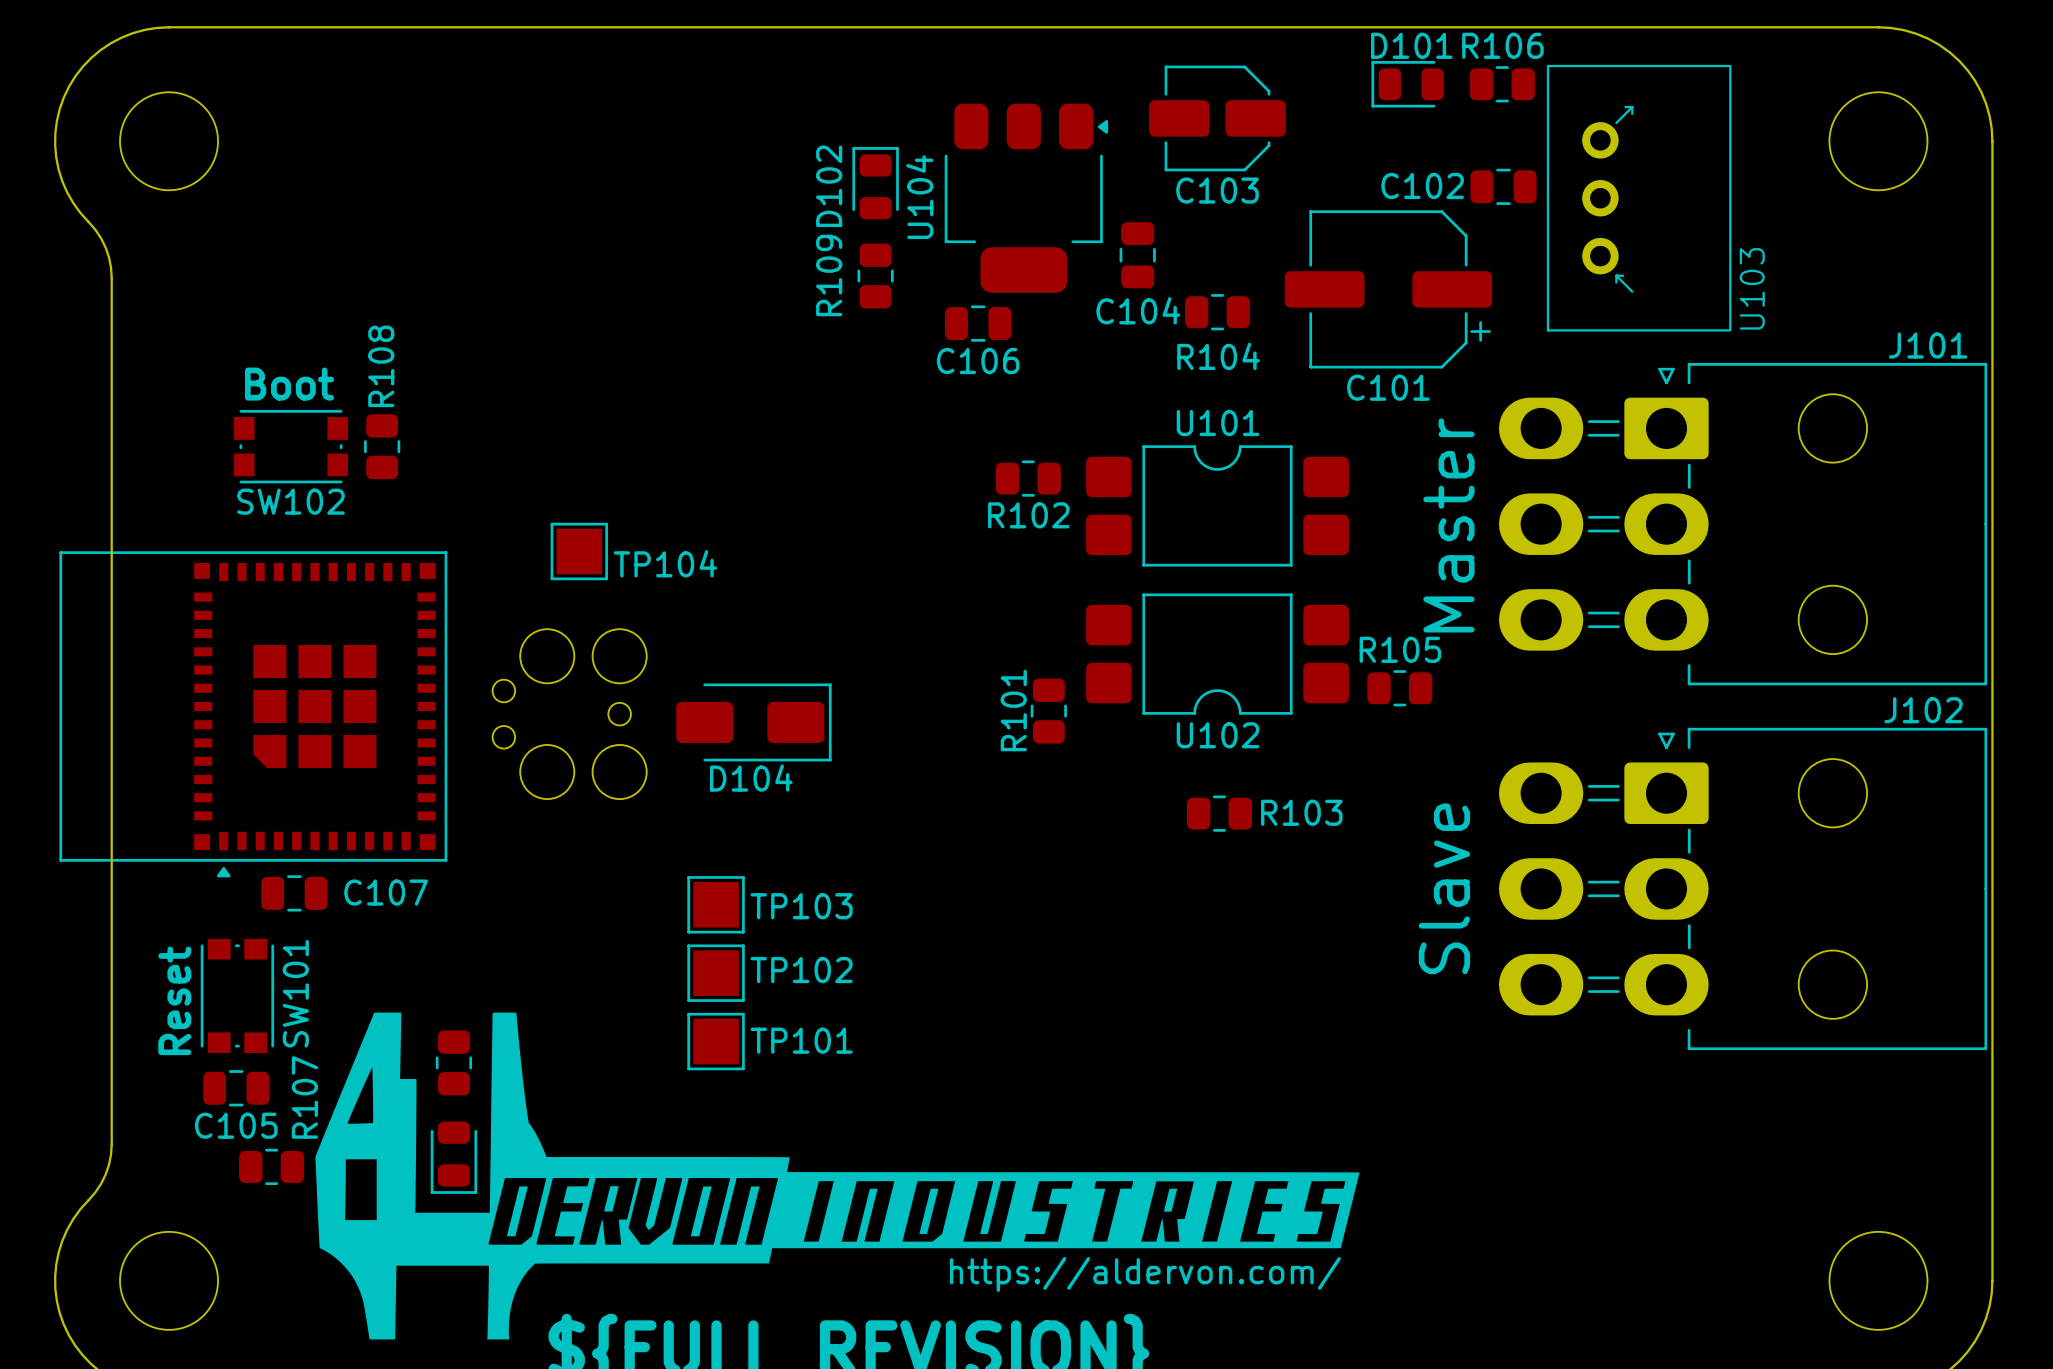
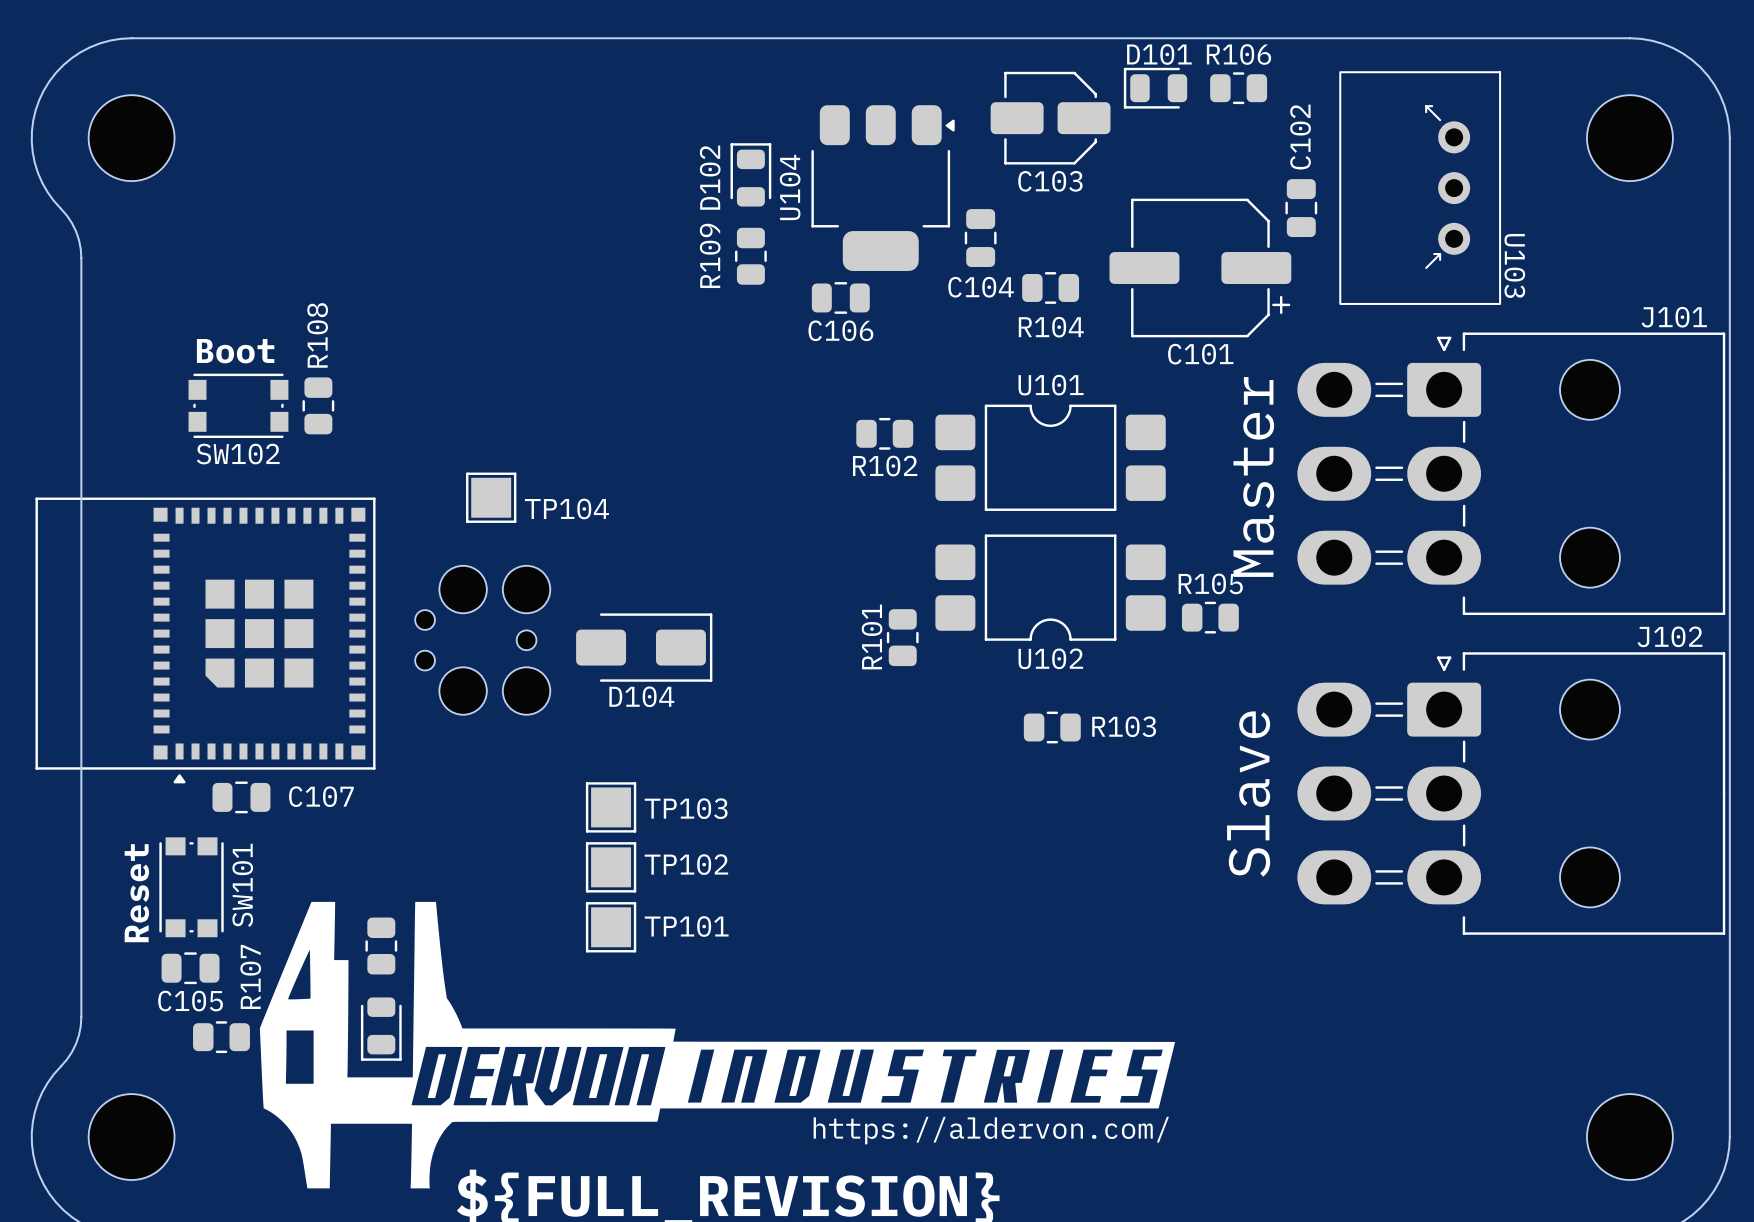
U103 footprint: [1546, 64, 1732, 332] -> [1339, 71, 1502, 305]
D101 position: (1407, 84) -> (1155, 88)
R106 position: (1502, 84) -> (1238, 88)
C102 rotation: 0° (1503, 186) -> 90° clockwise (1301, 208)

